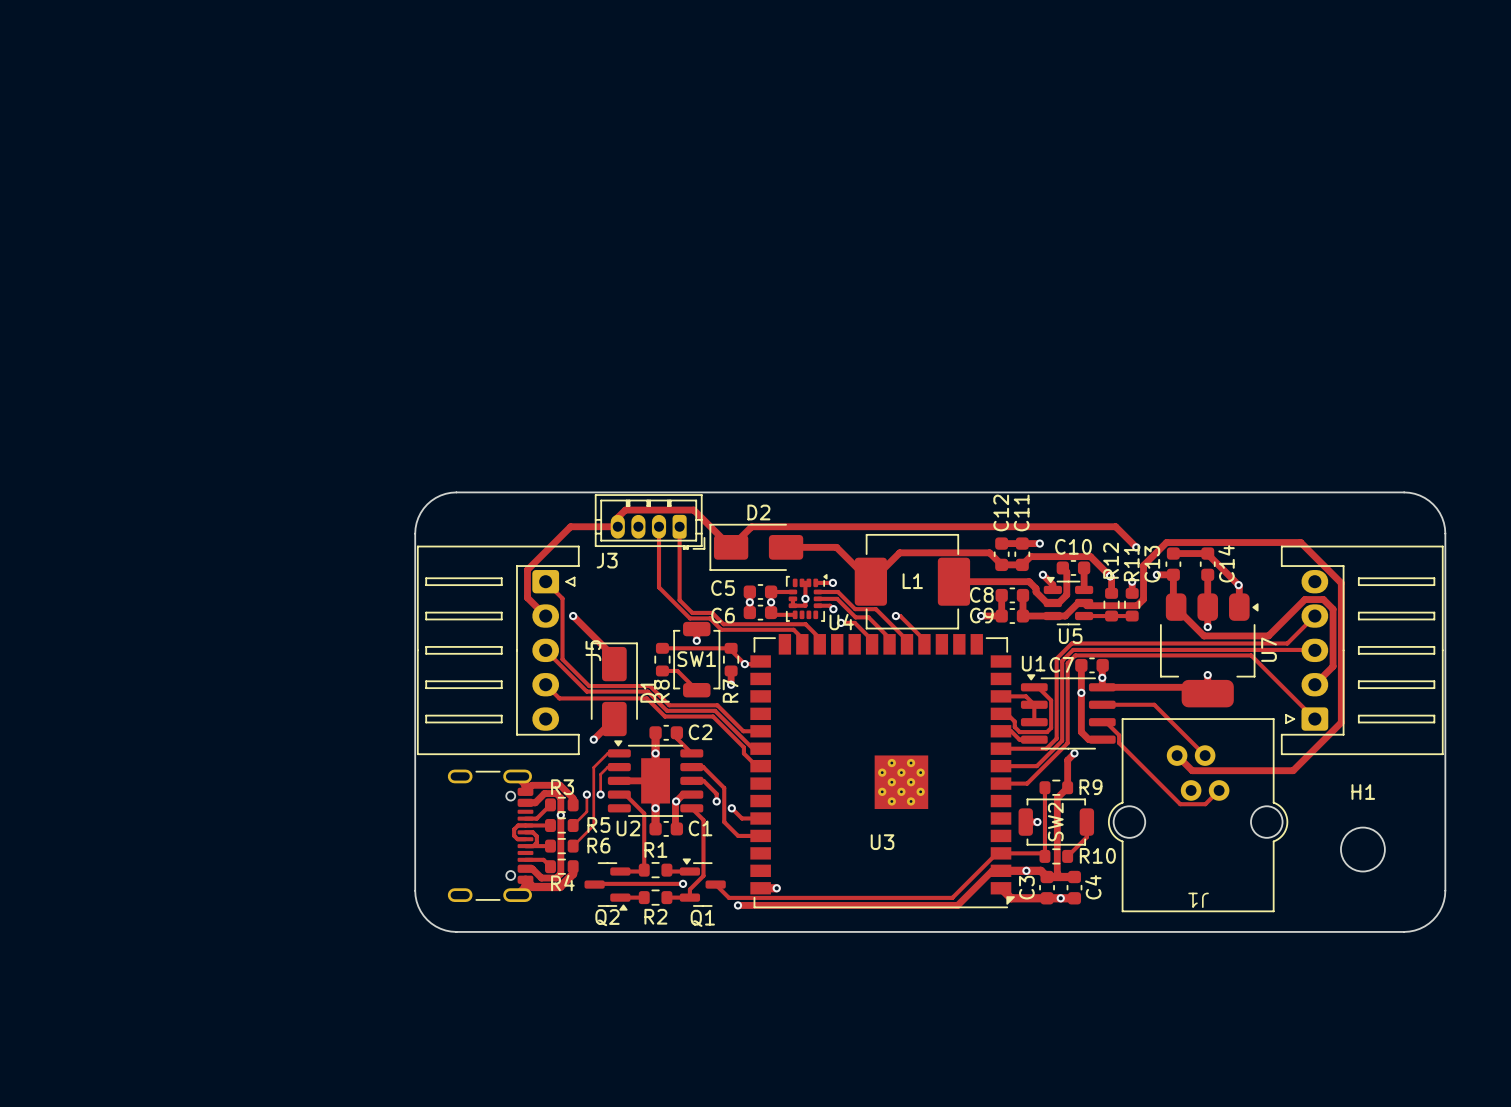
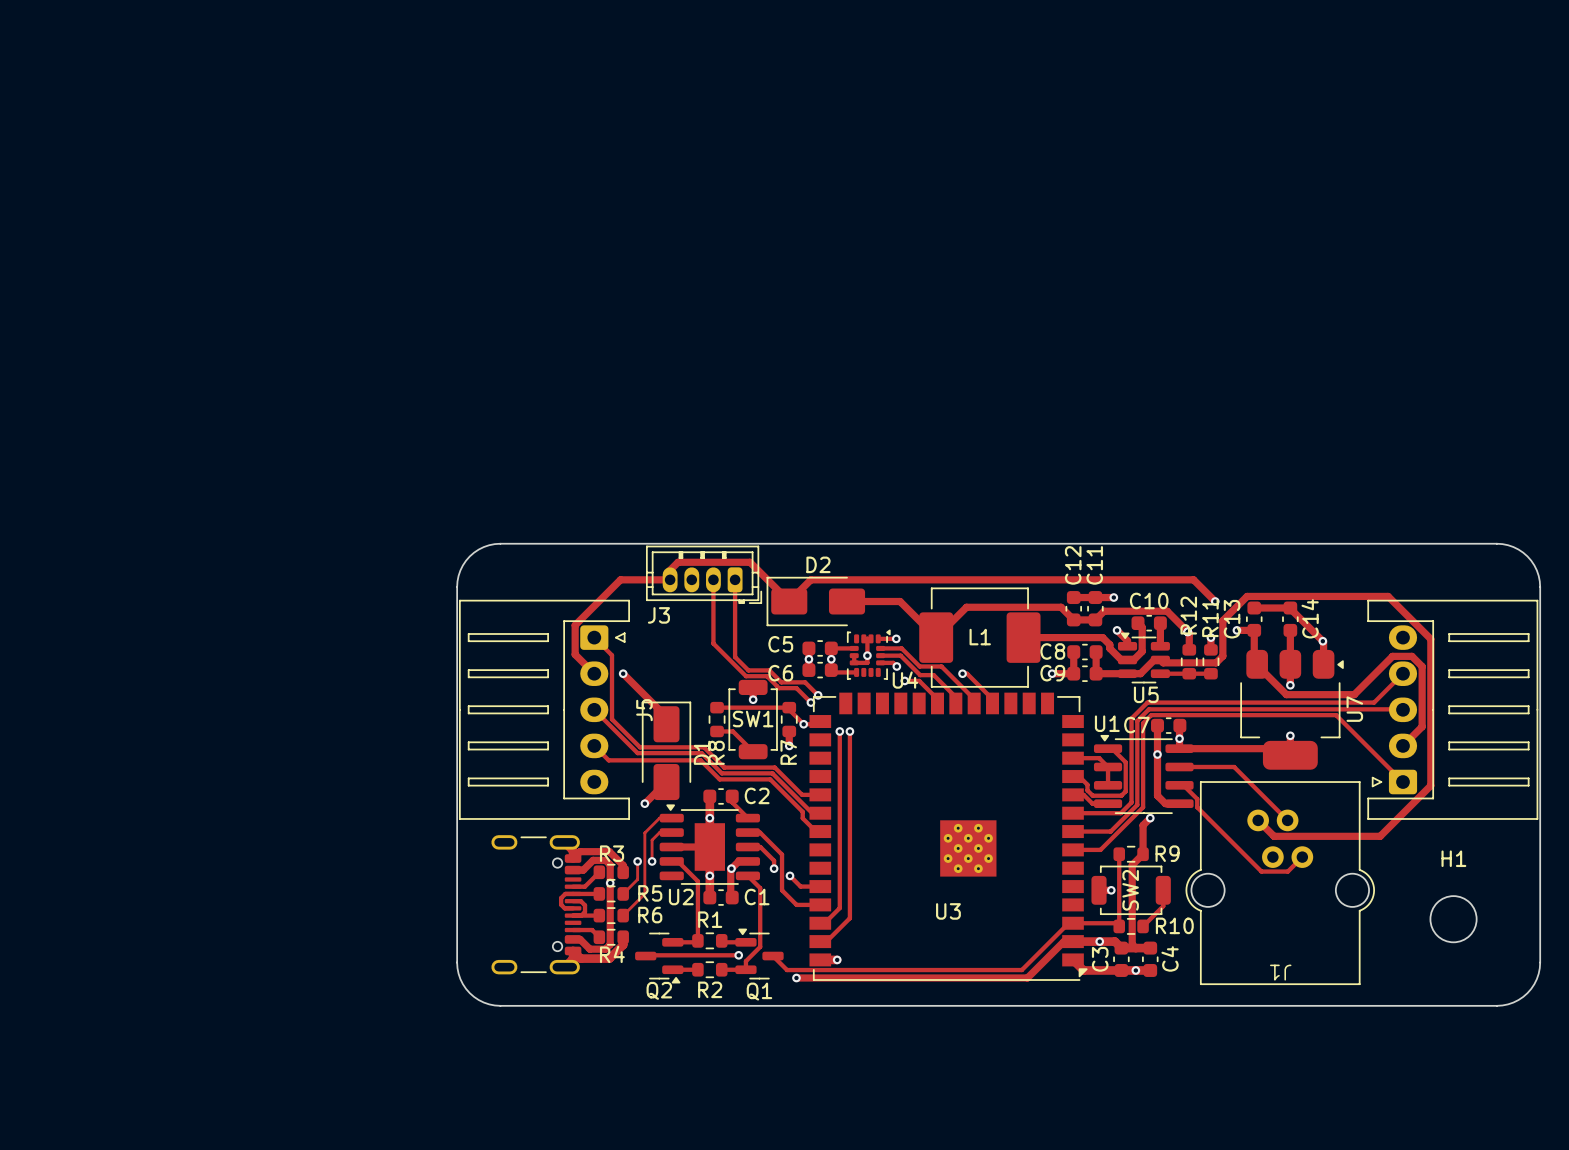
track: (746, 624) (805, 624) (819, 638) (819, 644) -> (805, 682) (818, 695)
track: (737, 629) (793, 629) (802, 638) (802, 644) -> (796, 688) (810, 702)
via: none -> (818, 695)
via: none -> (810, 702)
track: none -> (839, 731) (839, 908) (824, 923) (820, 923)
via: none -> (839, 731)
track: none -> (849, 731) (849, 918) (826, 941) (820, 941)
via: none -> (849, 731)

